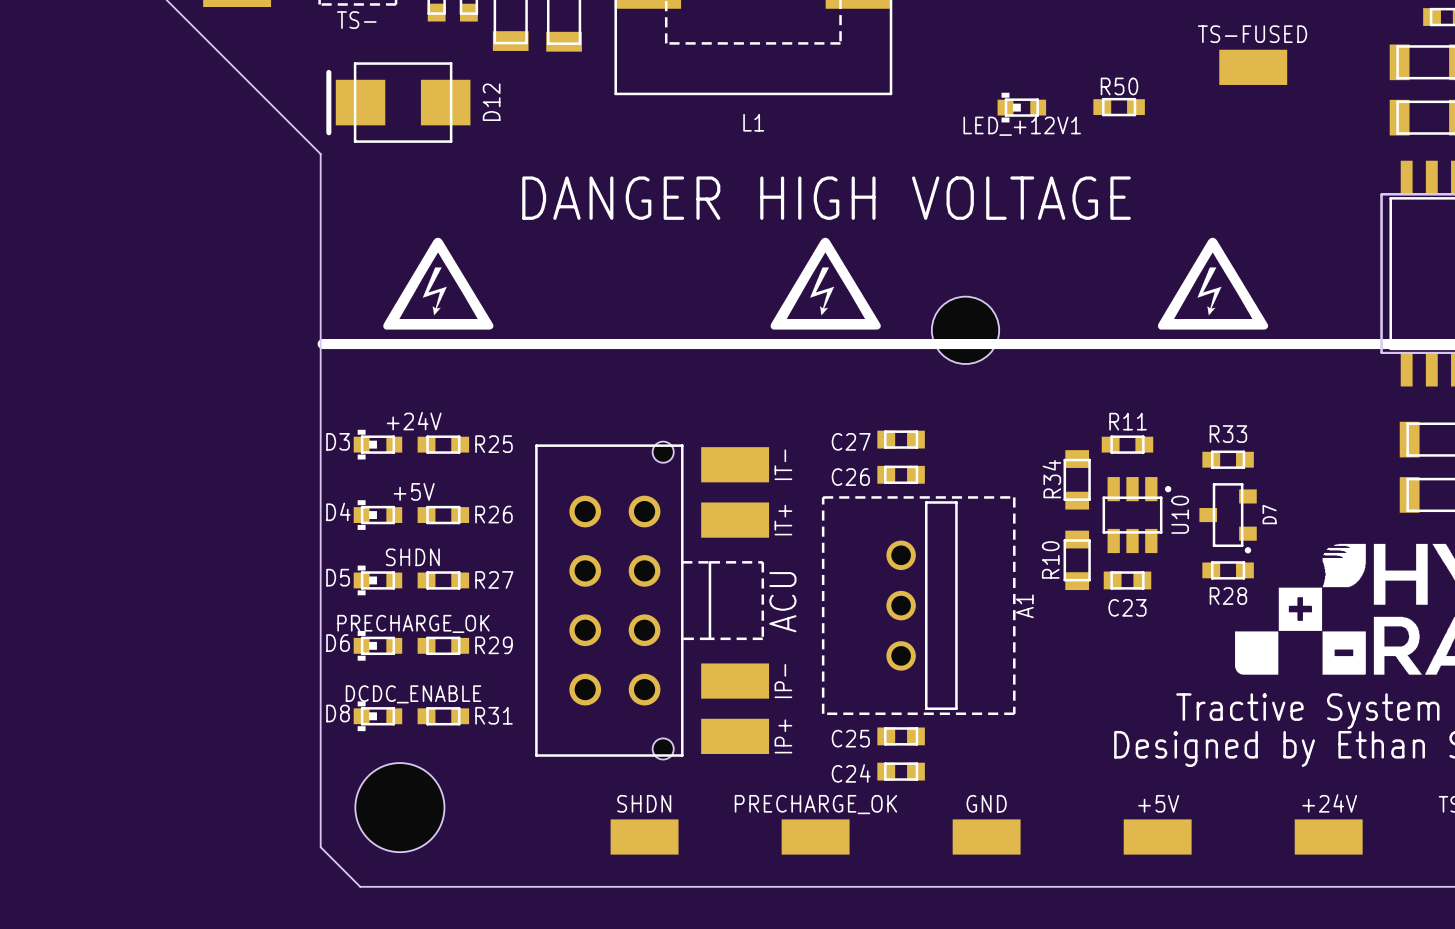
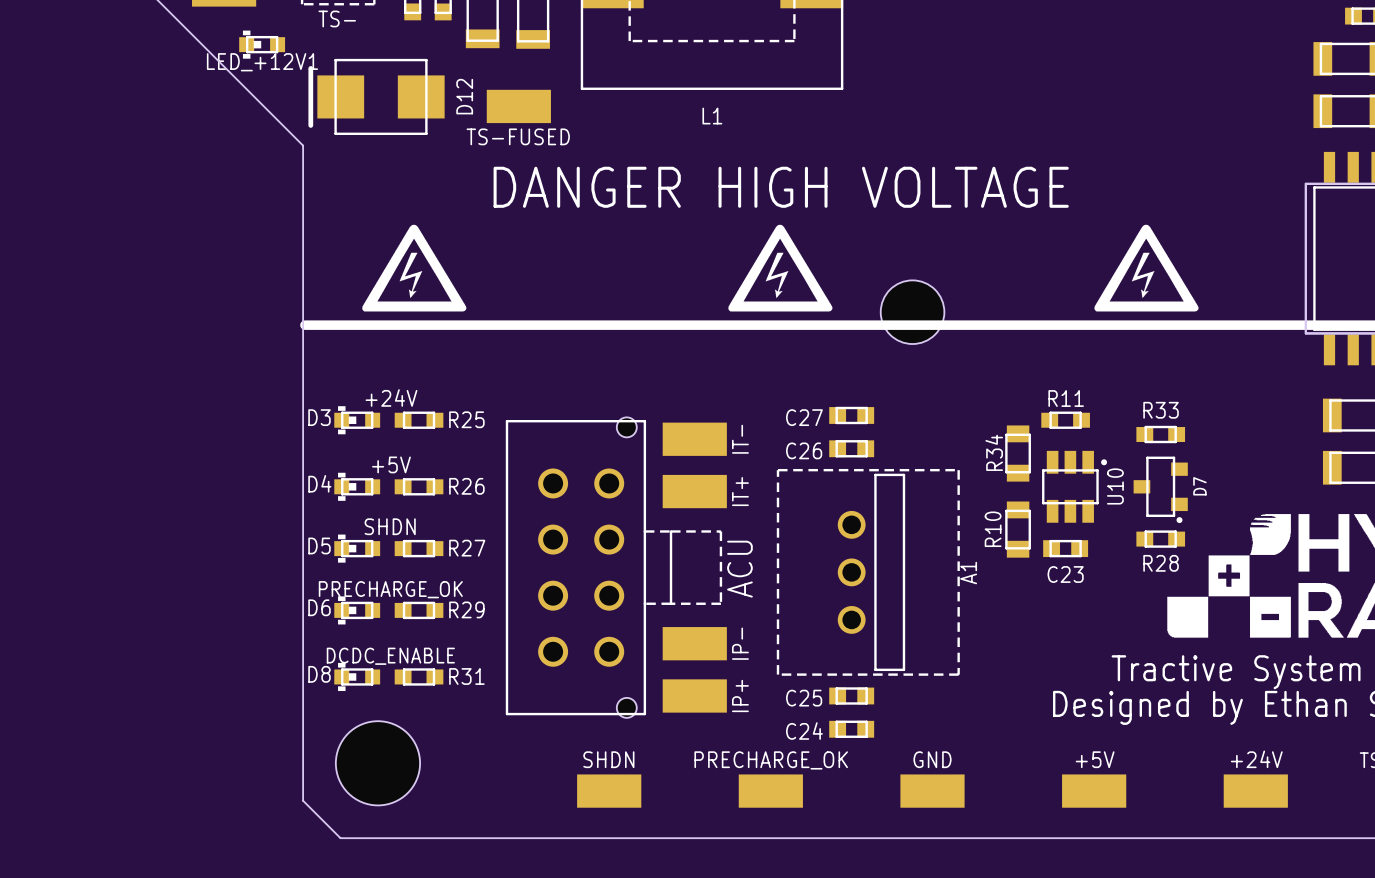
TS-FUSED: (1253, 67) -> none
LED_+12V1 position: (1021, 107) -> (262, 44)
R50: (1119, 107) -> none
TS-FUSED: none -> (518, 106)

